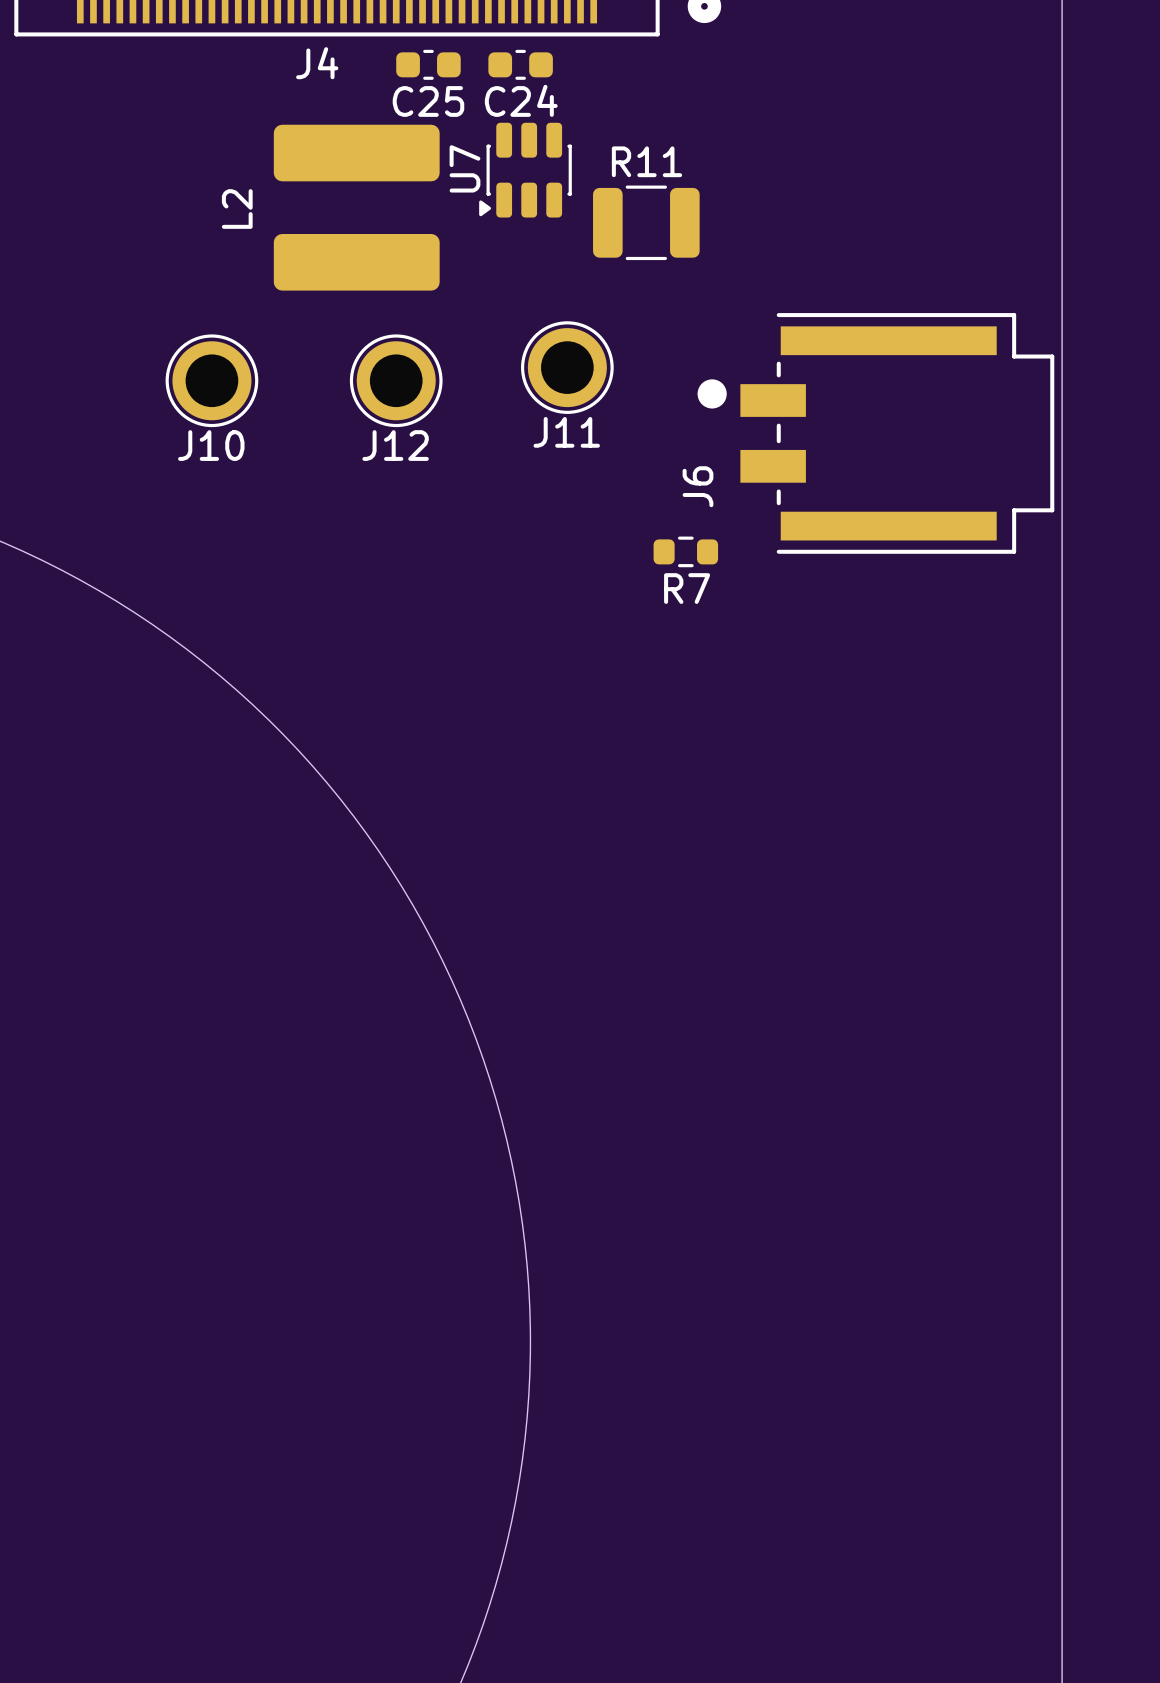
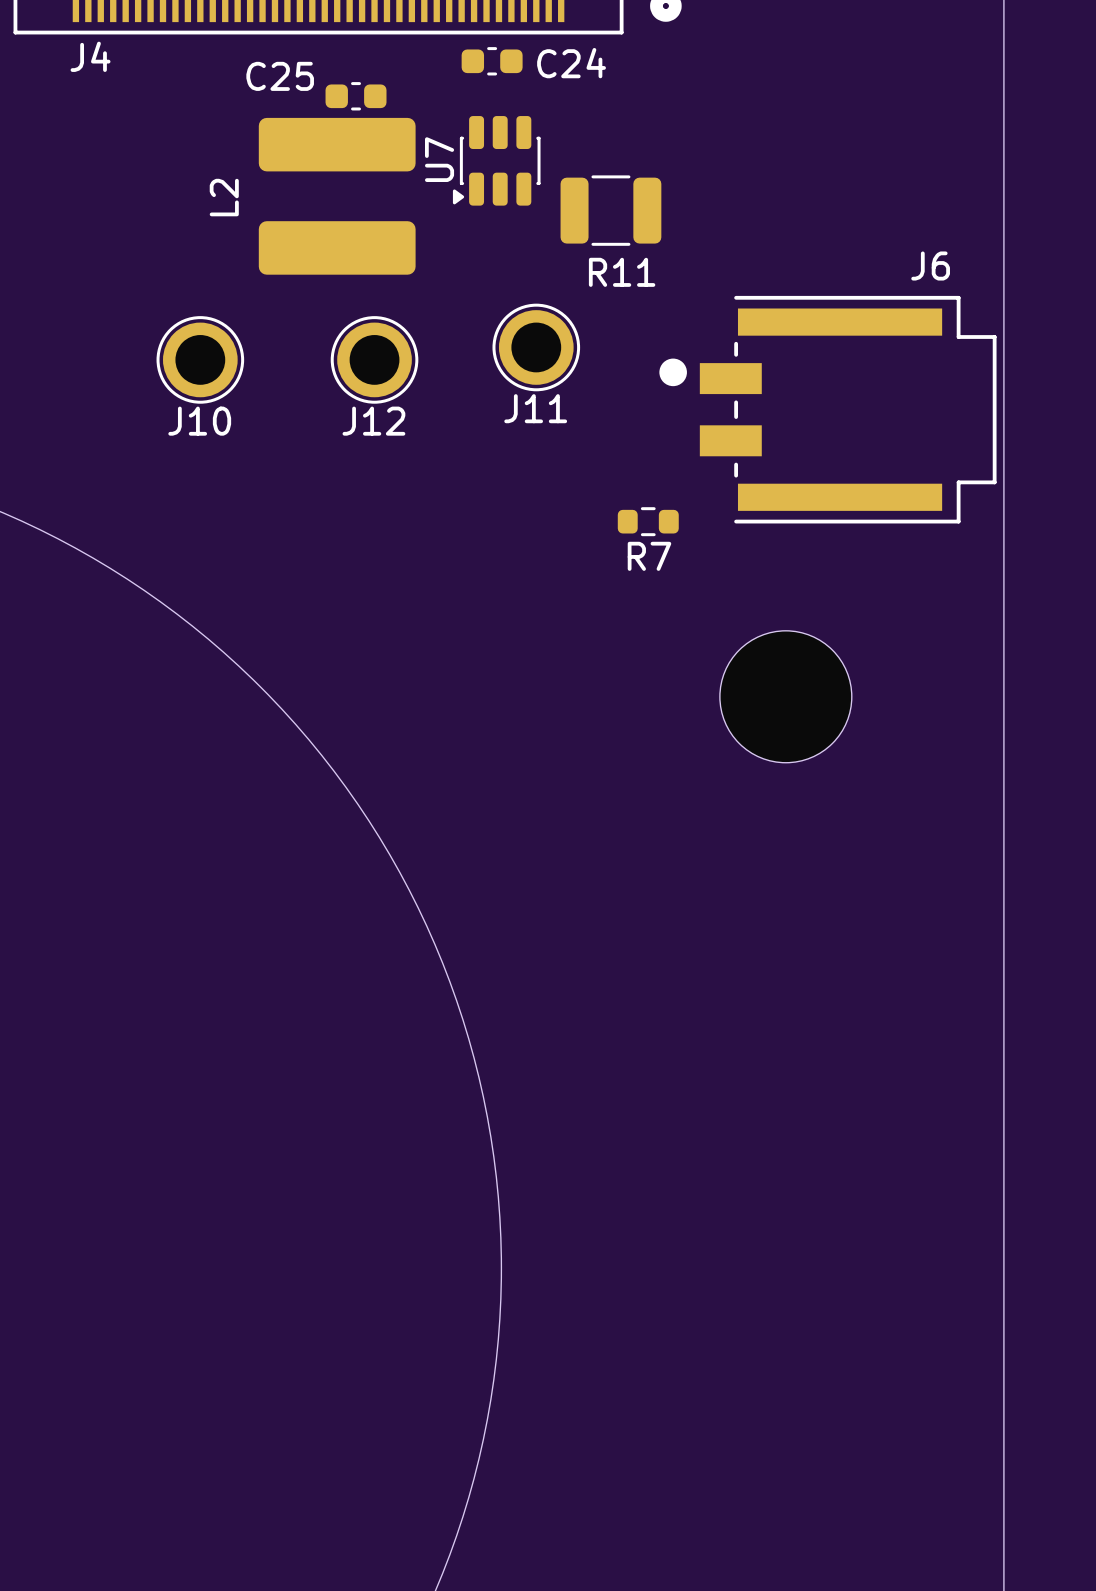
J4 name position: J4 (317, 63) -> J4 (90, 56)
C25 position: (428, 64) -> (356, 96)
C24 name position: C24 (521, 100) -> C24 (571, 63)
C25 name position: C25 (428, 101) -> C25 (280, 76)
R11 name position: R11 (646, 161) -> R11 (622, 272)
J6 name rotation: 0° (697, 486) -> 90° clockwise (930, 266)
J6 name position: J6 (697, 486) -> J6 (930, 266)
part: none -> (785, 696)

